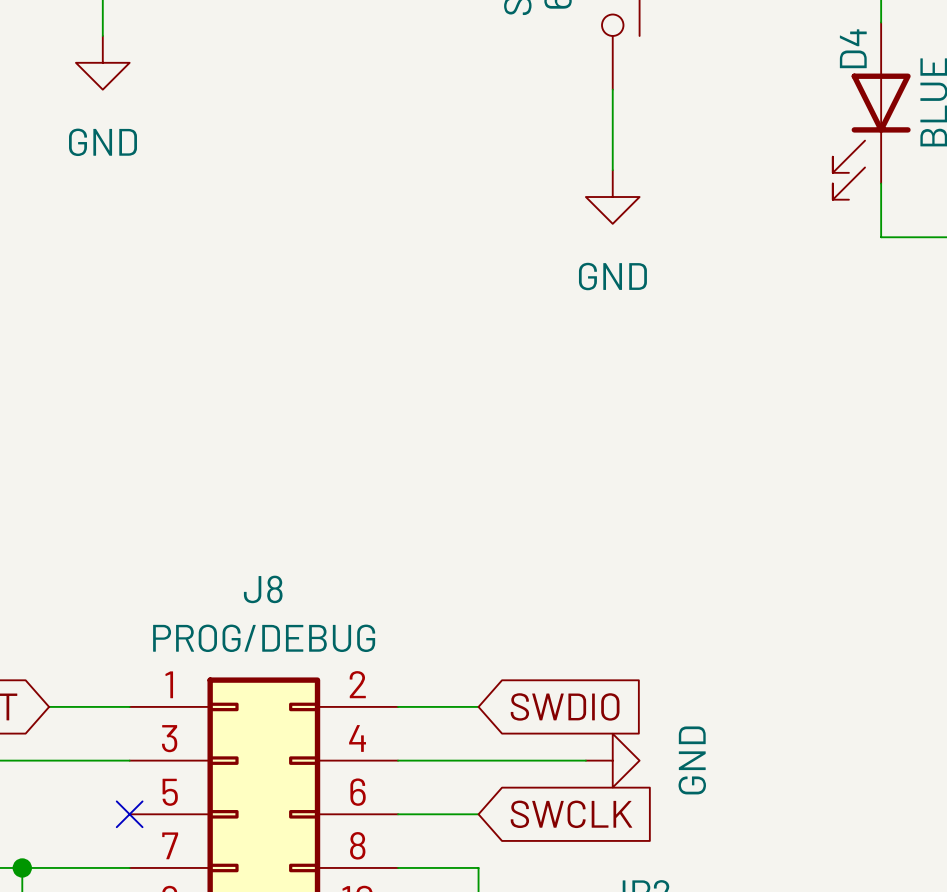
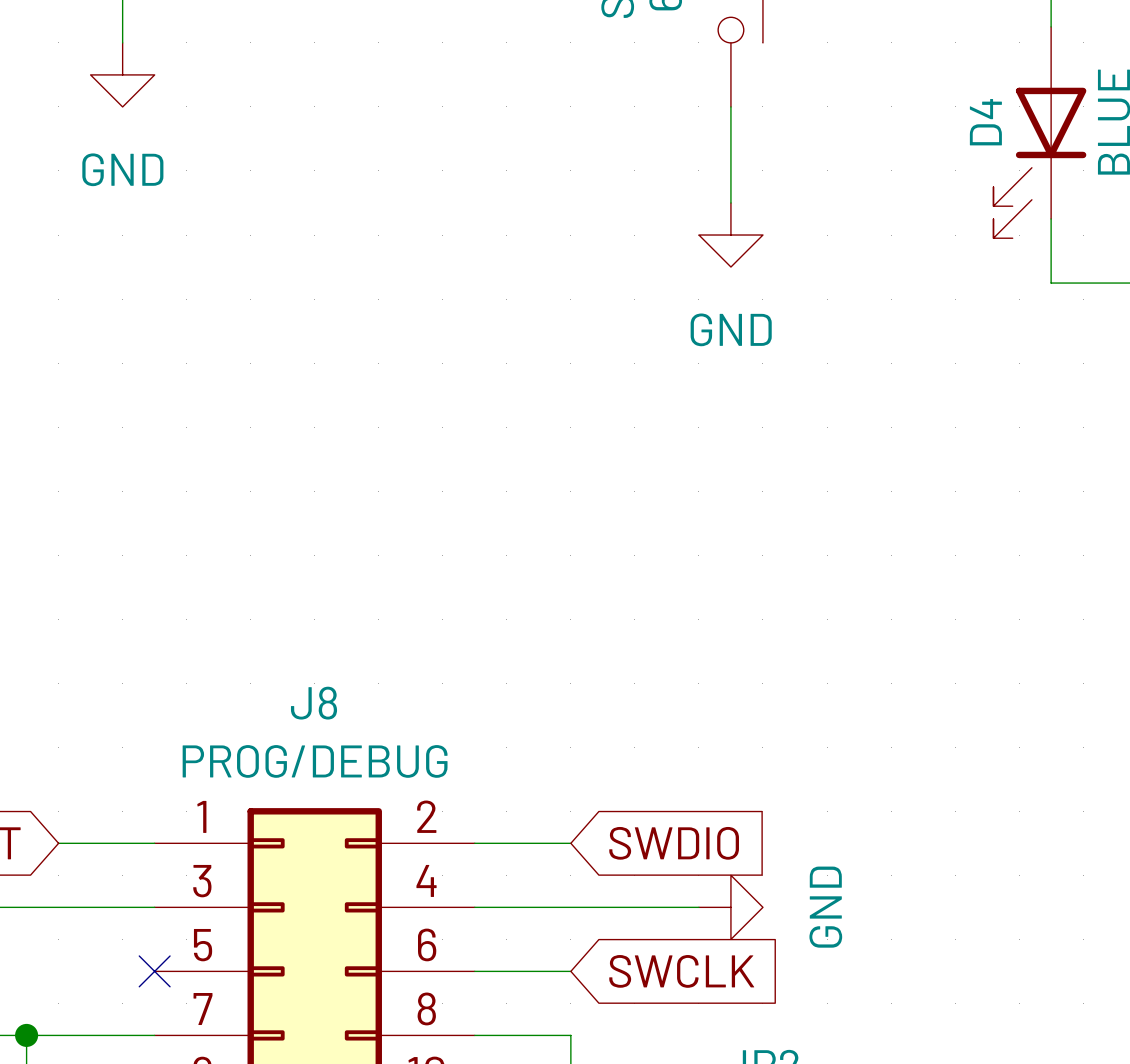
D4 name position: D4 (853, 48) -> D4 (985, 122)

